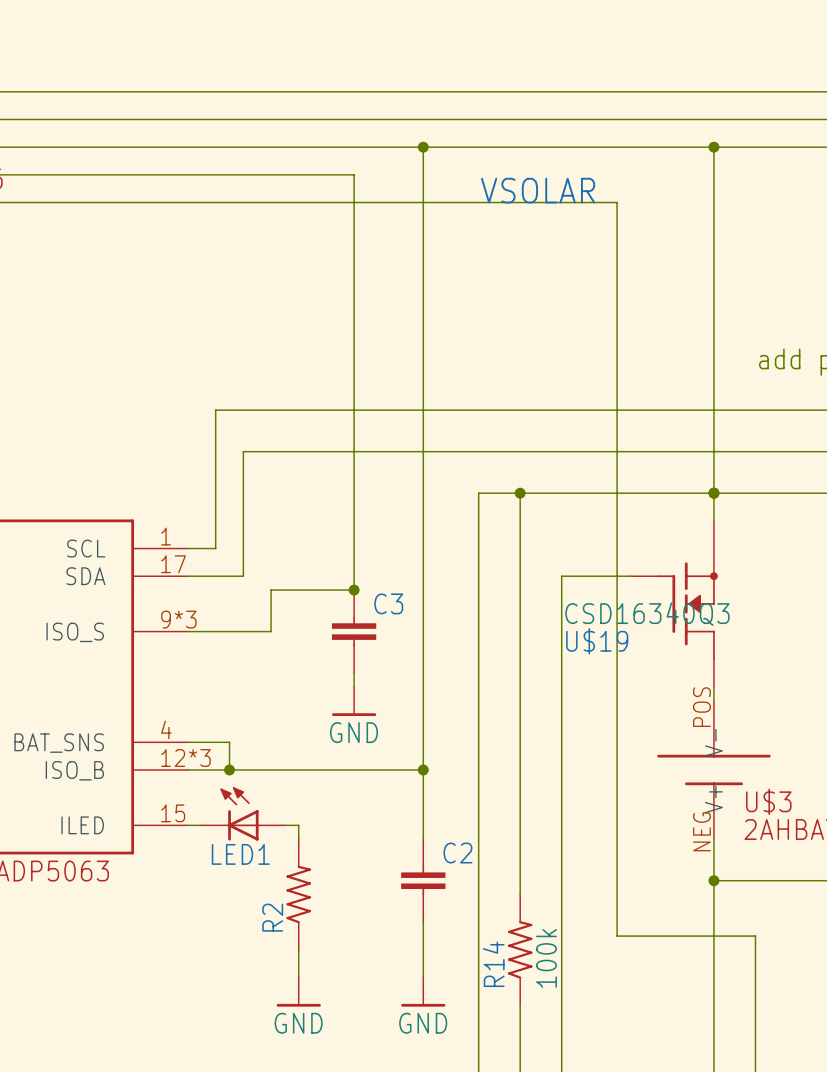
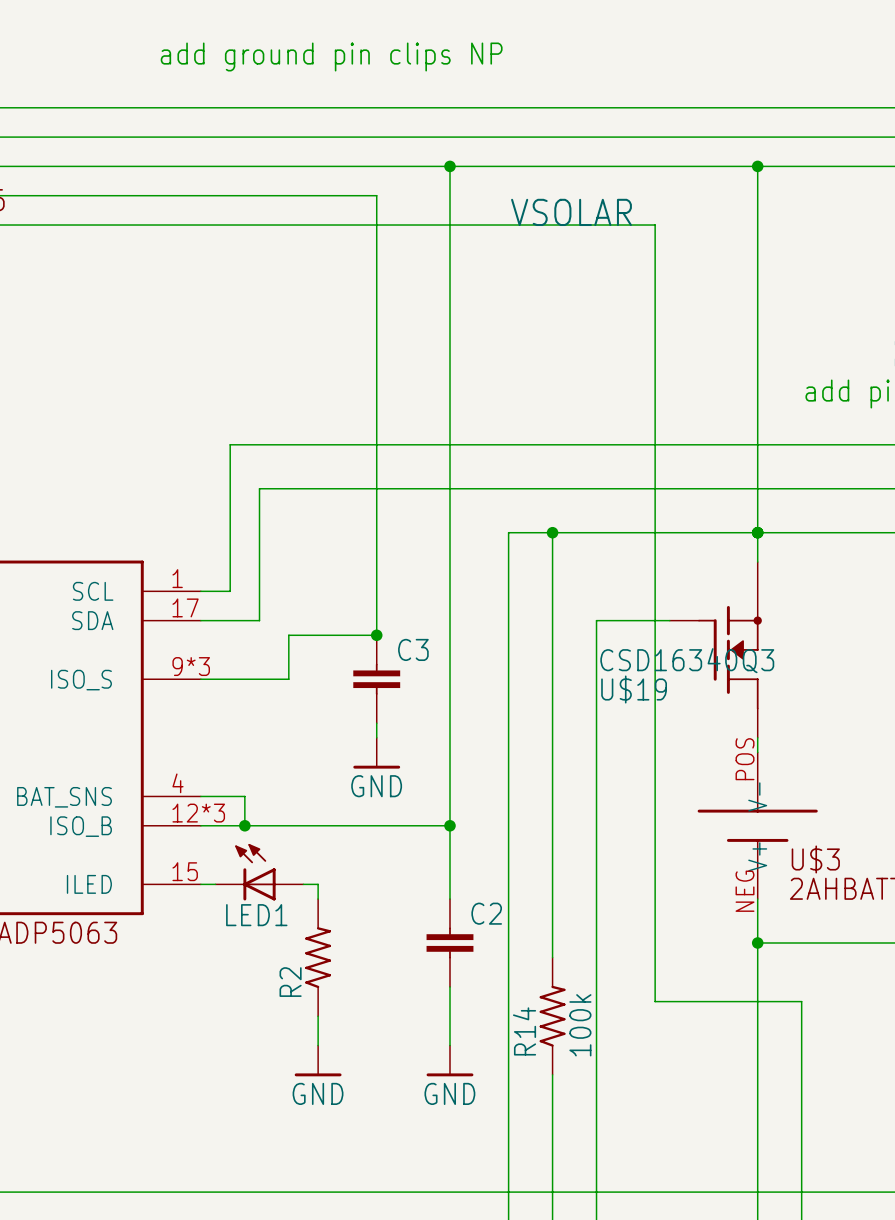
text: none -> add ground pin clips NP (331, 56)

